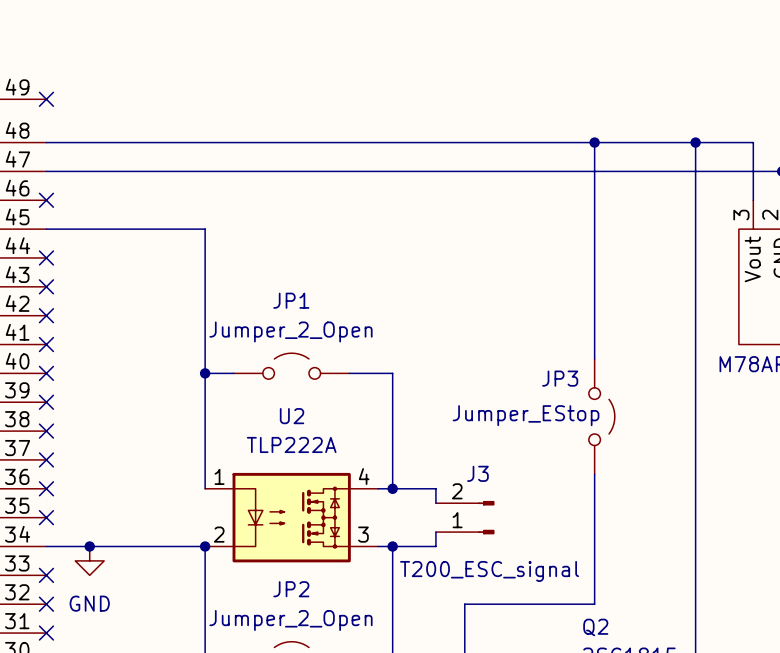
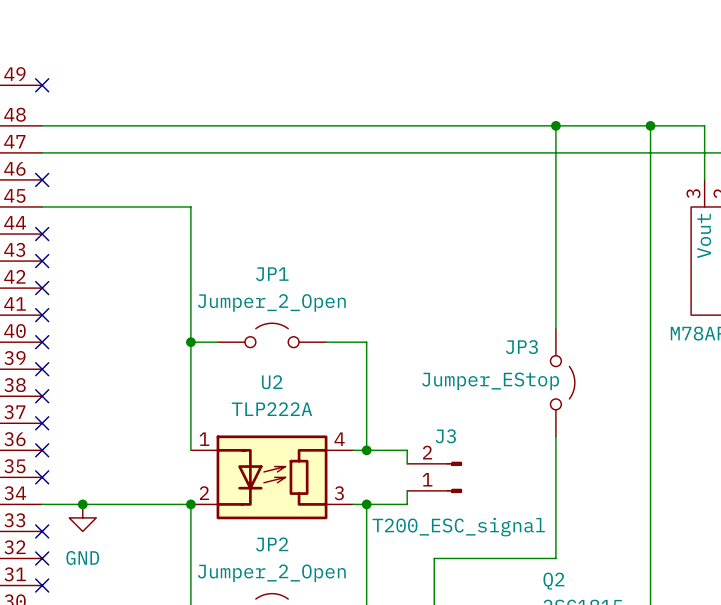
U2 symbol: [205, 472, 379, 563] -> [190, 435, 354, 520]

